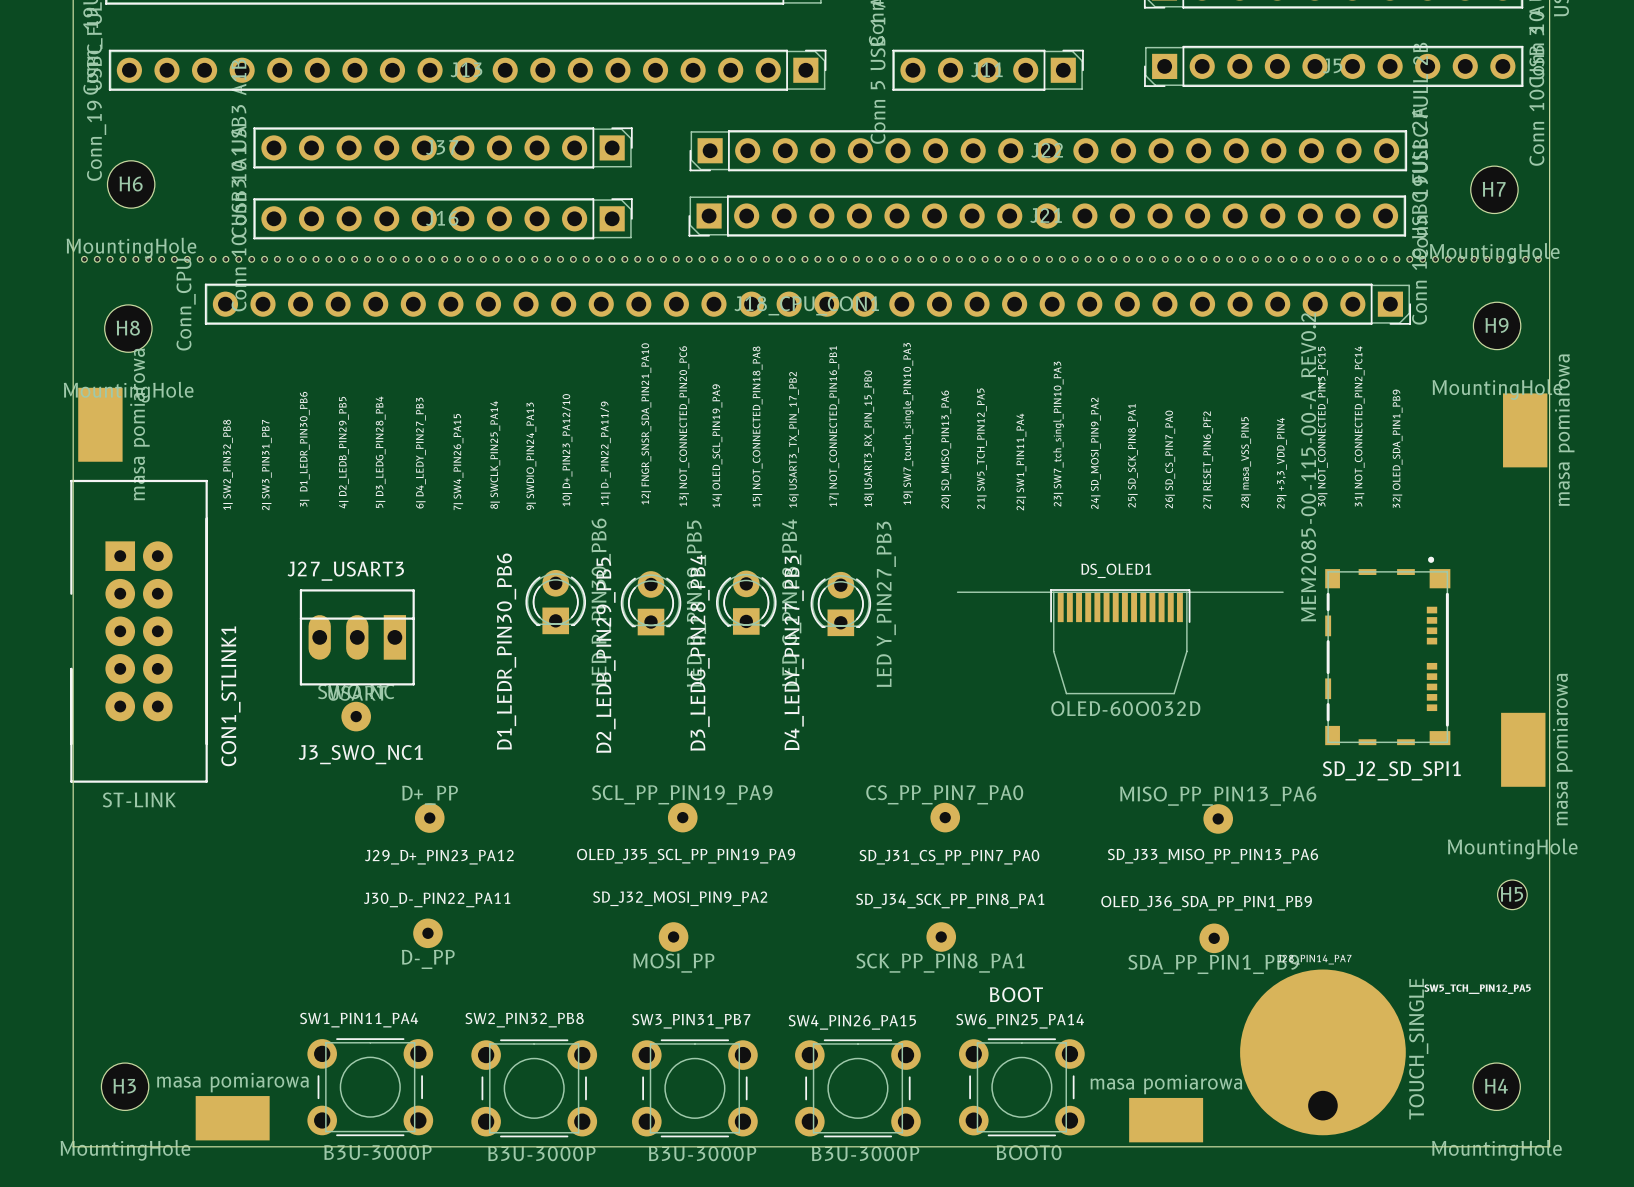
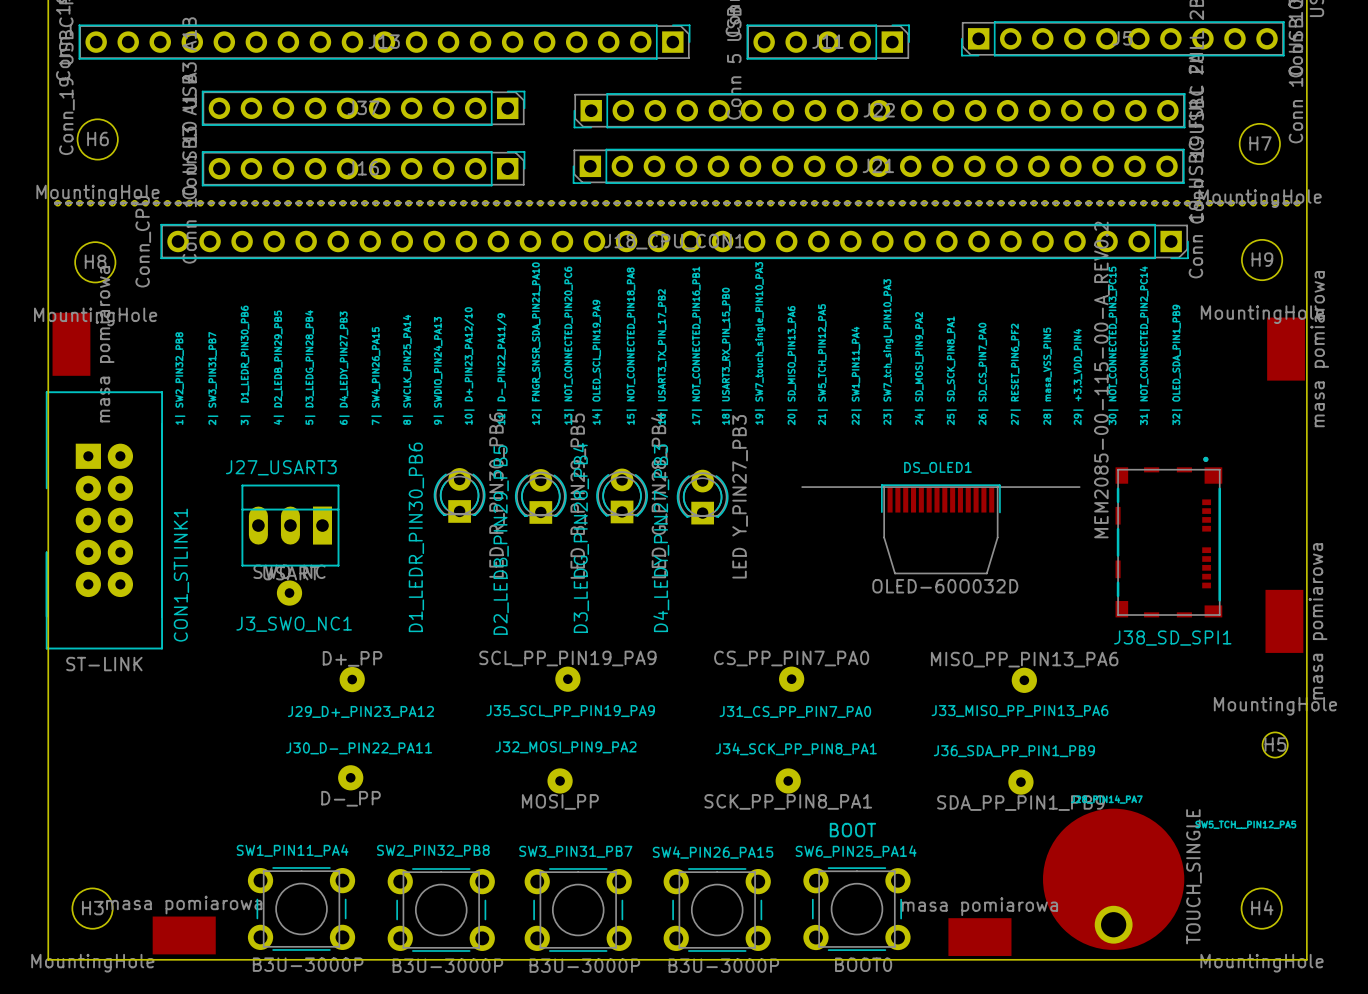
SD_J2_SD_SPI1 name: SD_J2_SD_SPI1 (1391, 770) -> J38_SD_SPI1 (1172, 638)
OLED_J35_SCL_PP_PIN19_PA9 name: OLED_J35_SCL_PP_PIN19_PA9 (686, 856) -> J35_SCL_PP_PIN19_PA9 (570, 711)
SD_J33_MISO_PP_PIN13_PA6 name: SD_J33_MISO_PP_PIN13_PA6 (1212, 856) -> J33_MISO_PP_PIN13_PA6 (1019, 711)
SD_J31_CS_PP_PIN7_PA0 name: SD_J31_CS_PP_PIN7_PA0 (949, 857) -> J31_CS_PP_PIN7_PA0 (795, 711)
SD_J32_MOSI_PIN9_PA2 name: SD_J32_MOSI_PIN9_PA2 (680, 898) -> J32_MOSI_PIN9_PA2 (566, 747)
SD_J34_SCK_PP_PIN8_PA1 name: SD_J34_SCK_PP_PIN8_PA1 (950, 900) -> J34_SCK_PP_PIN8_PA1 (796, 749)
OLED_J36_SDA_PP_PIN1_PB9 name: OLED_J36_SDA_PP_PIN1_PB9 (1206, 903) -> J36_SDA_PP_PIN1_PB9 (1014, 751)

